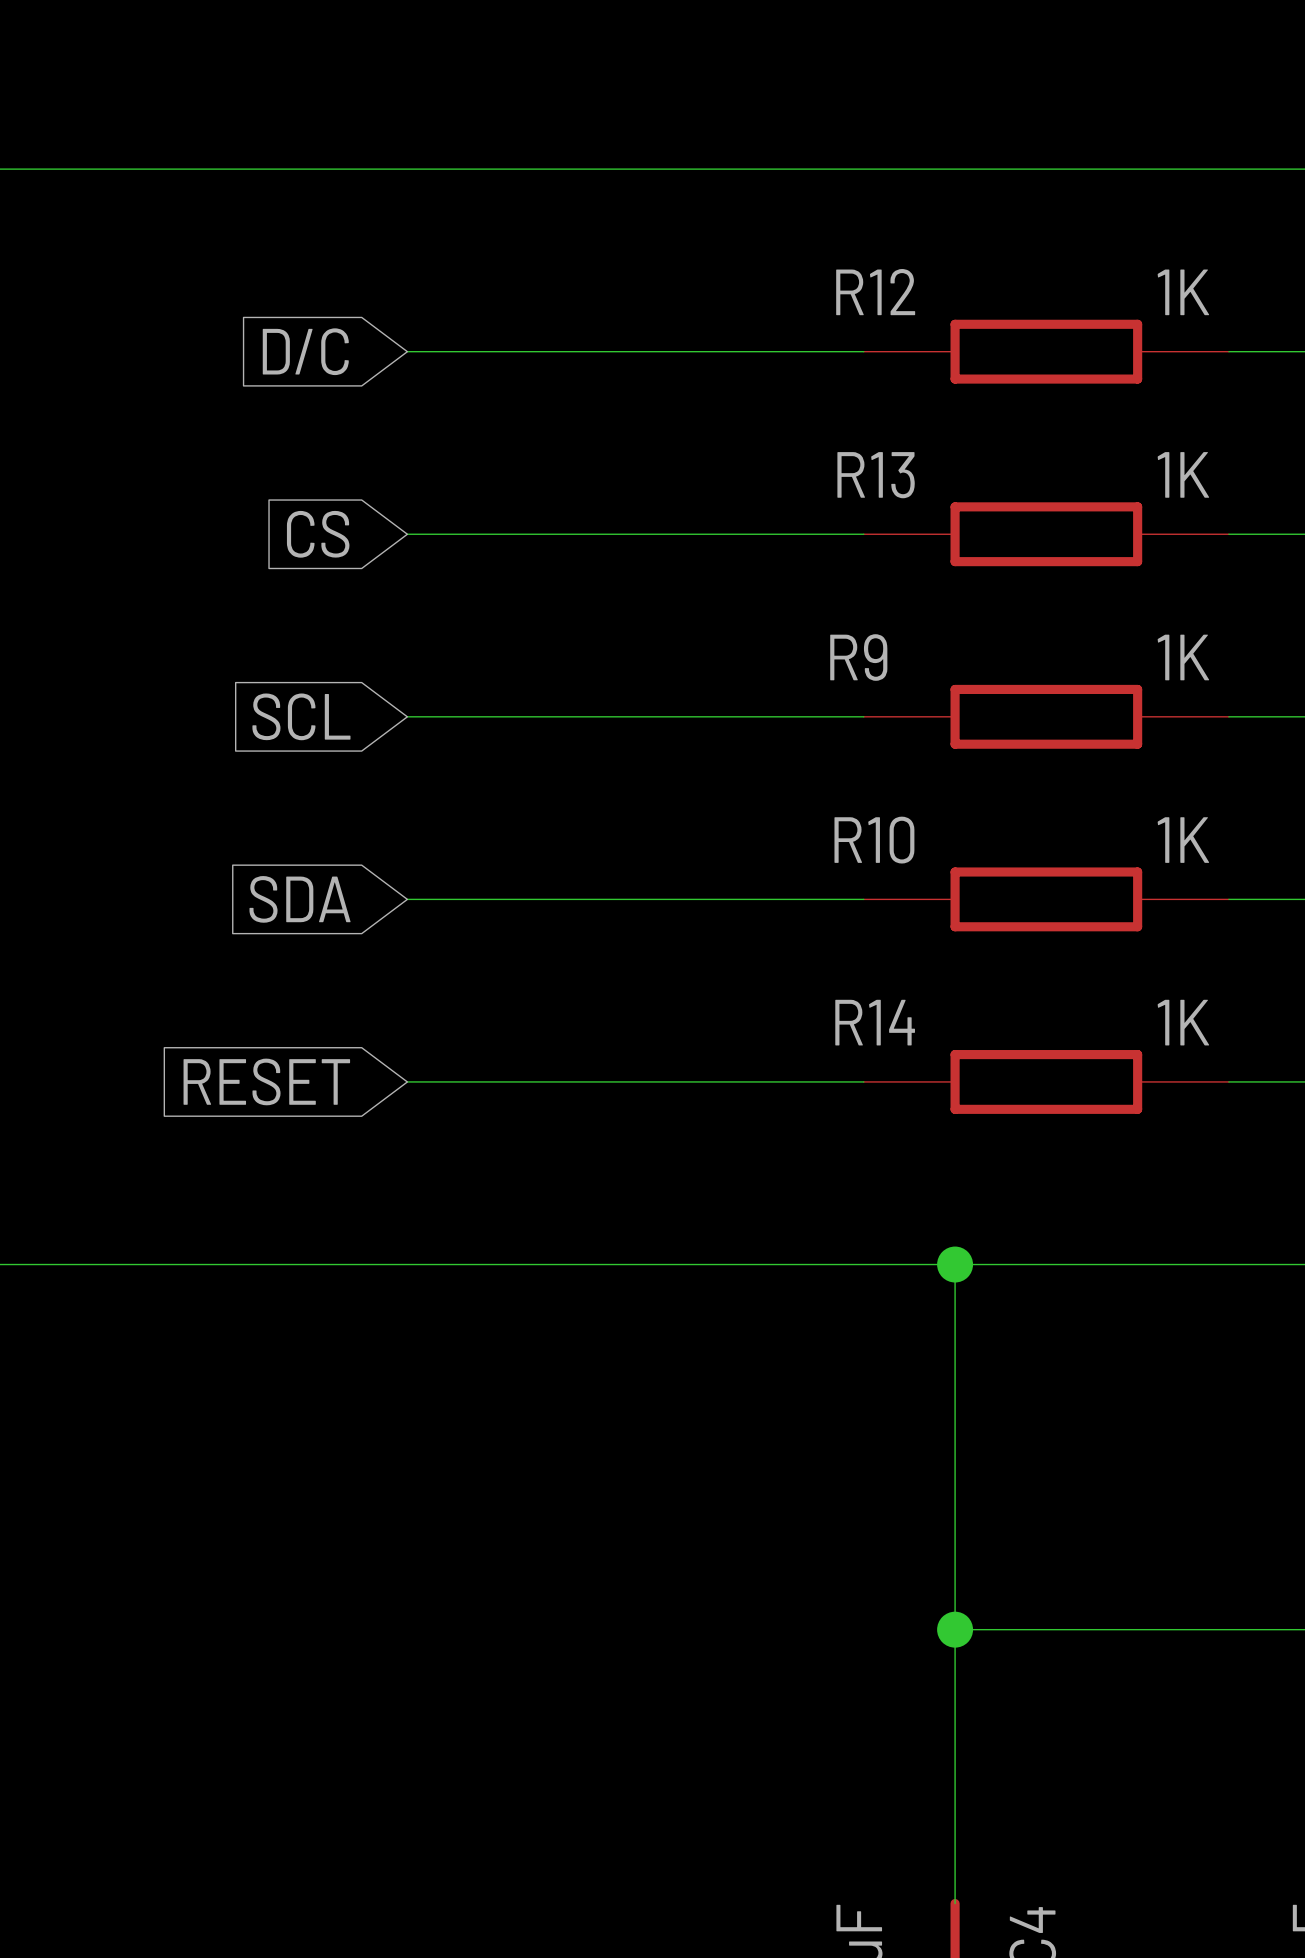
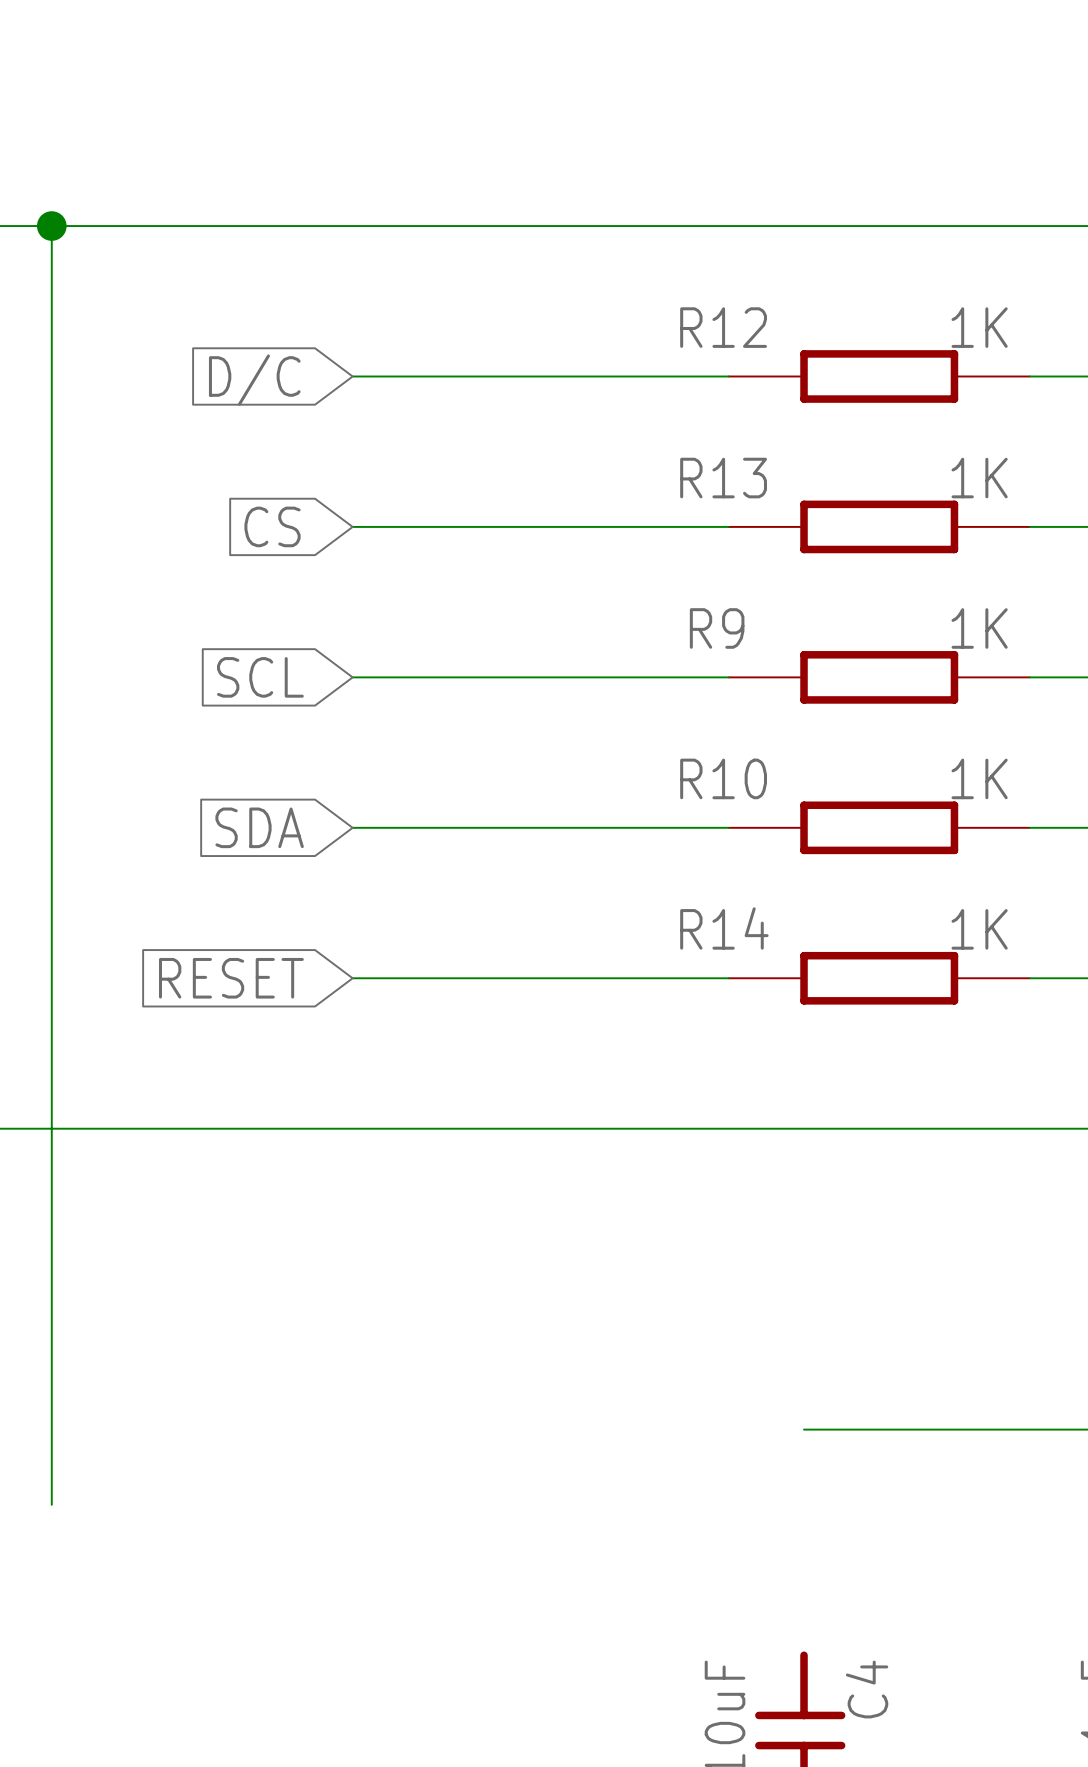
wire: none -> (51, 226) (51, 1504)
junction: none -> (51, 226)
wire: (955, 1264) (955, 1903) -> none
junction: (955, 1264) -> none
junction: (955, 1629) -> none

